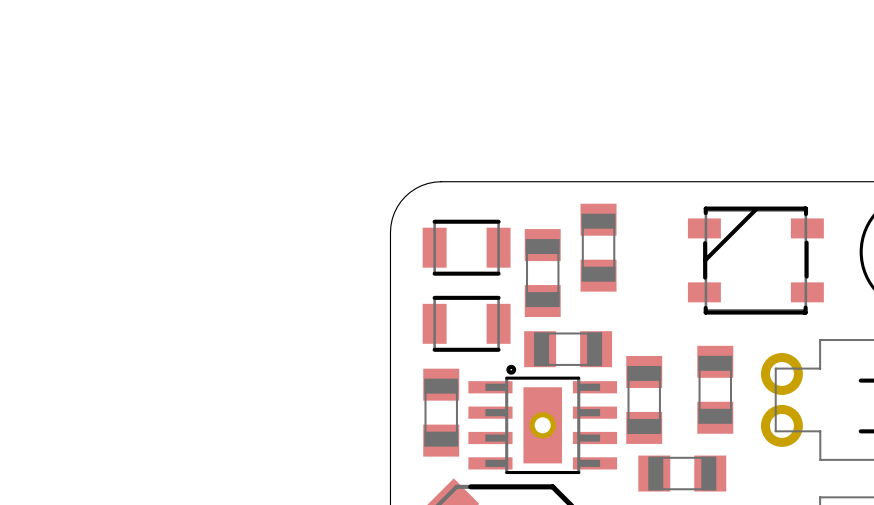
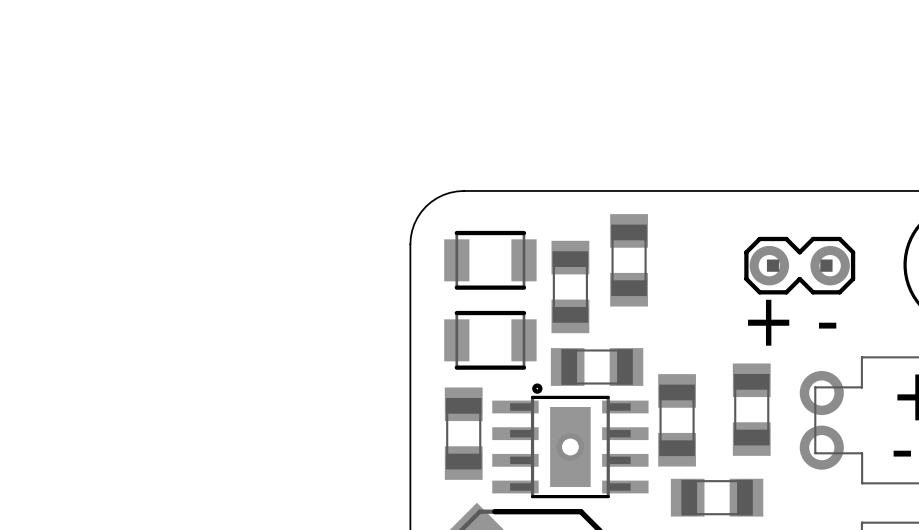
part footprint: [687, 206, 824, 315] -> [744, 236, 856, 295]
text: none -> + (768, 322)
text: none -> - (827, 325)

